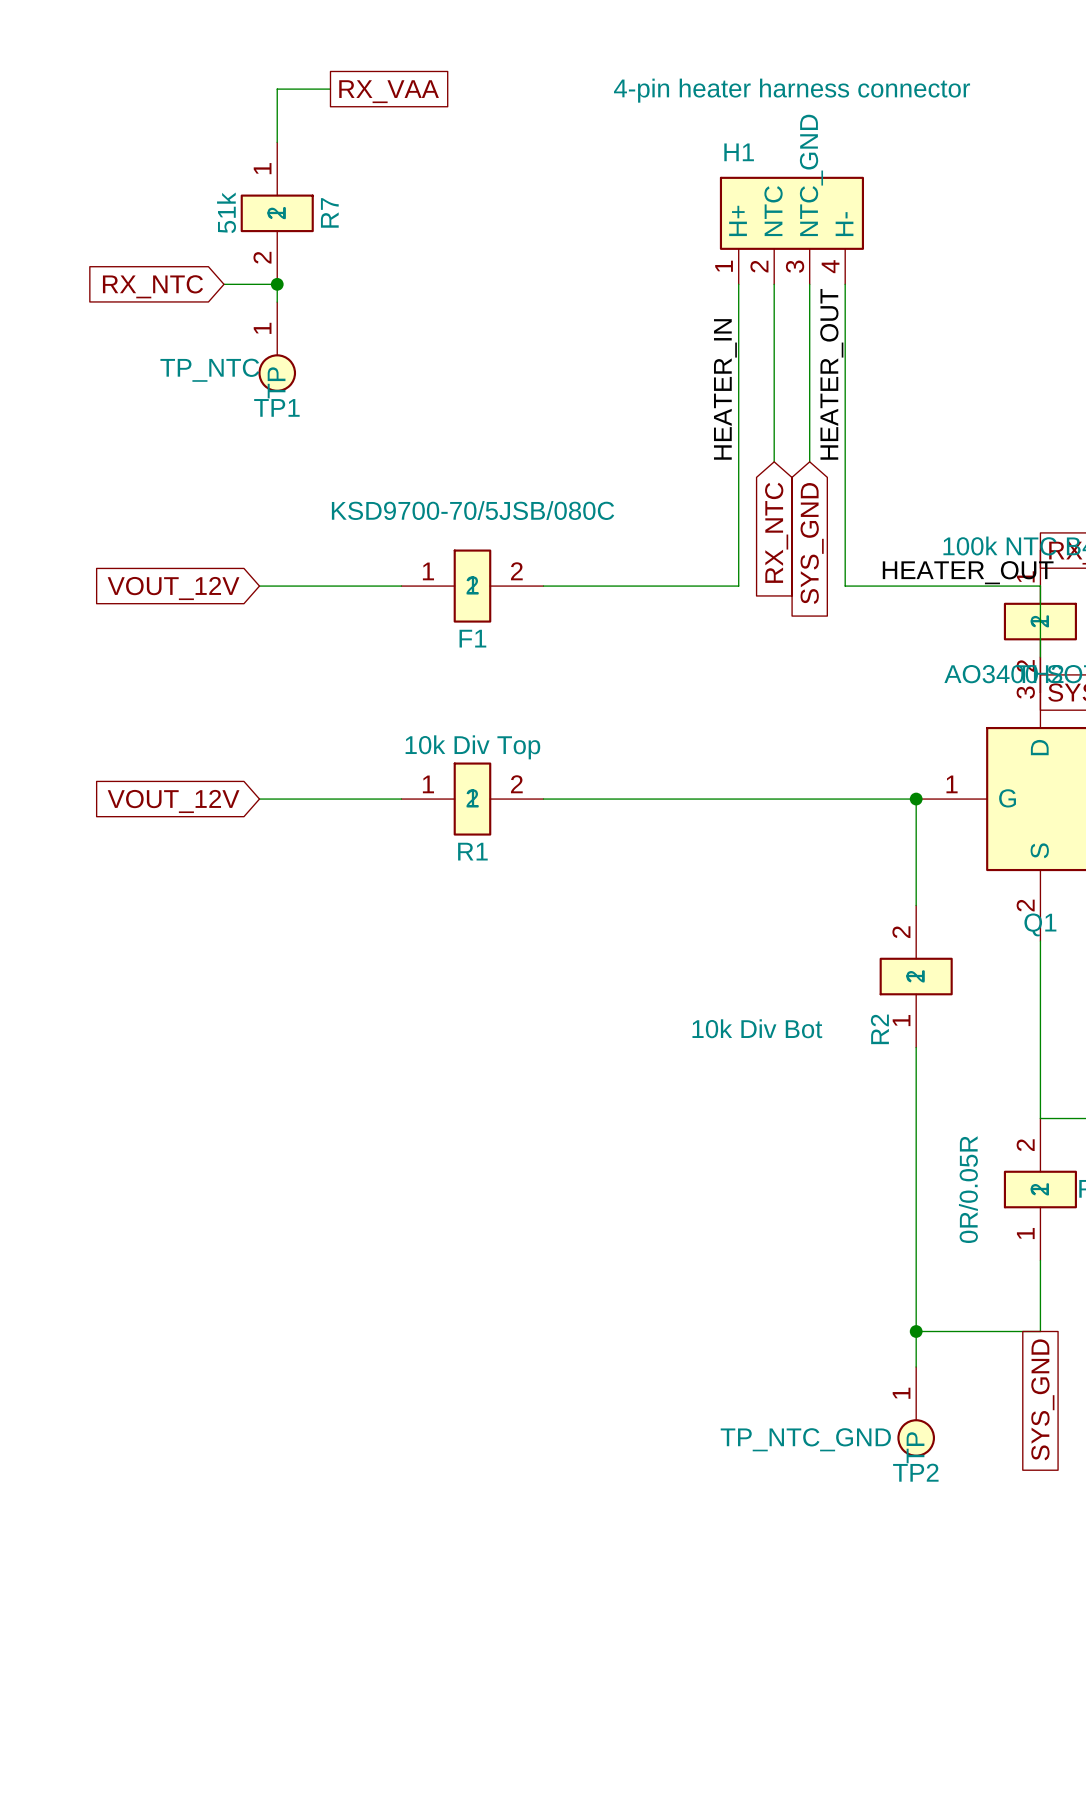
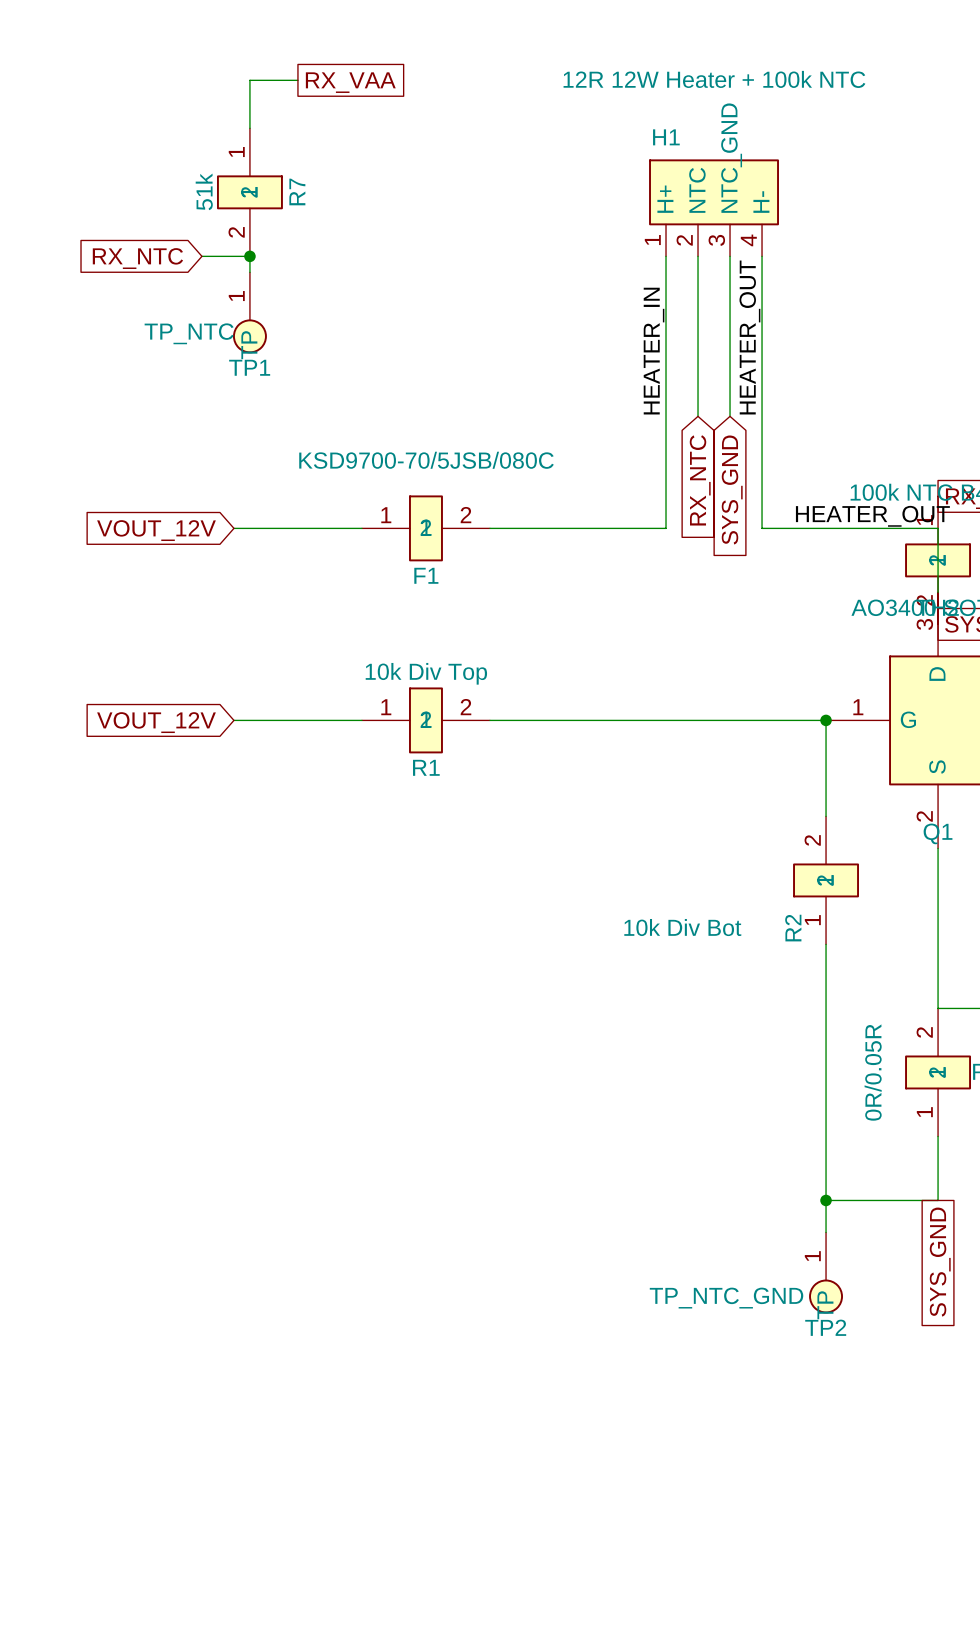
H1 value: 4-pin heater harness connector (792, 90) -> 12R 12W Heater + 100k NTC (714, 79)

